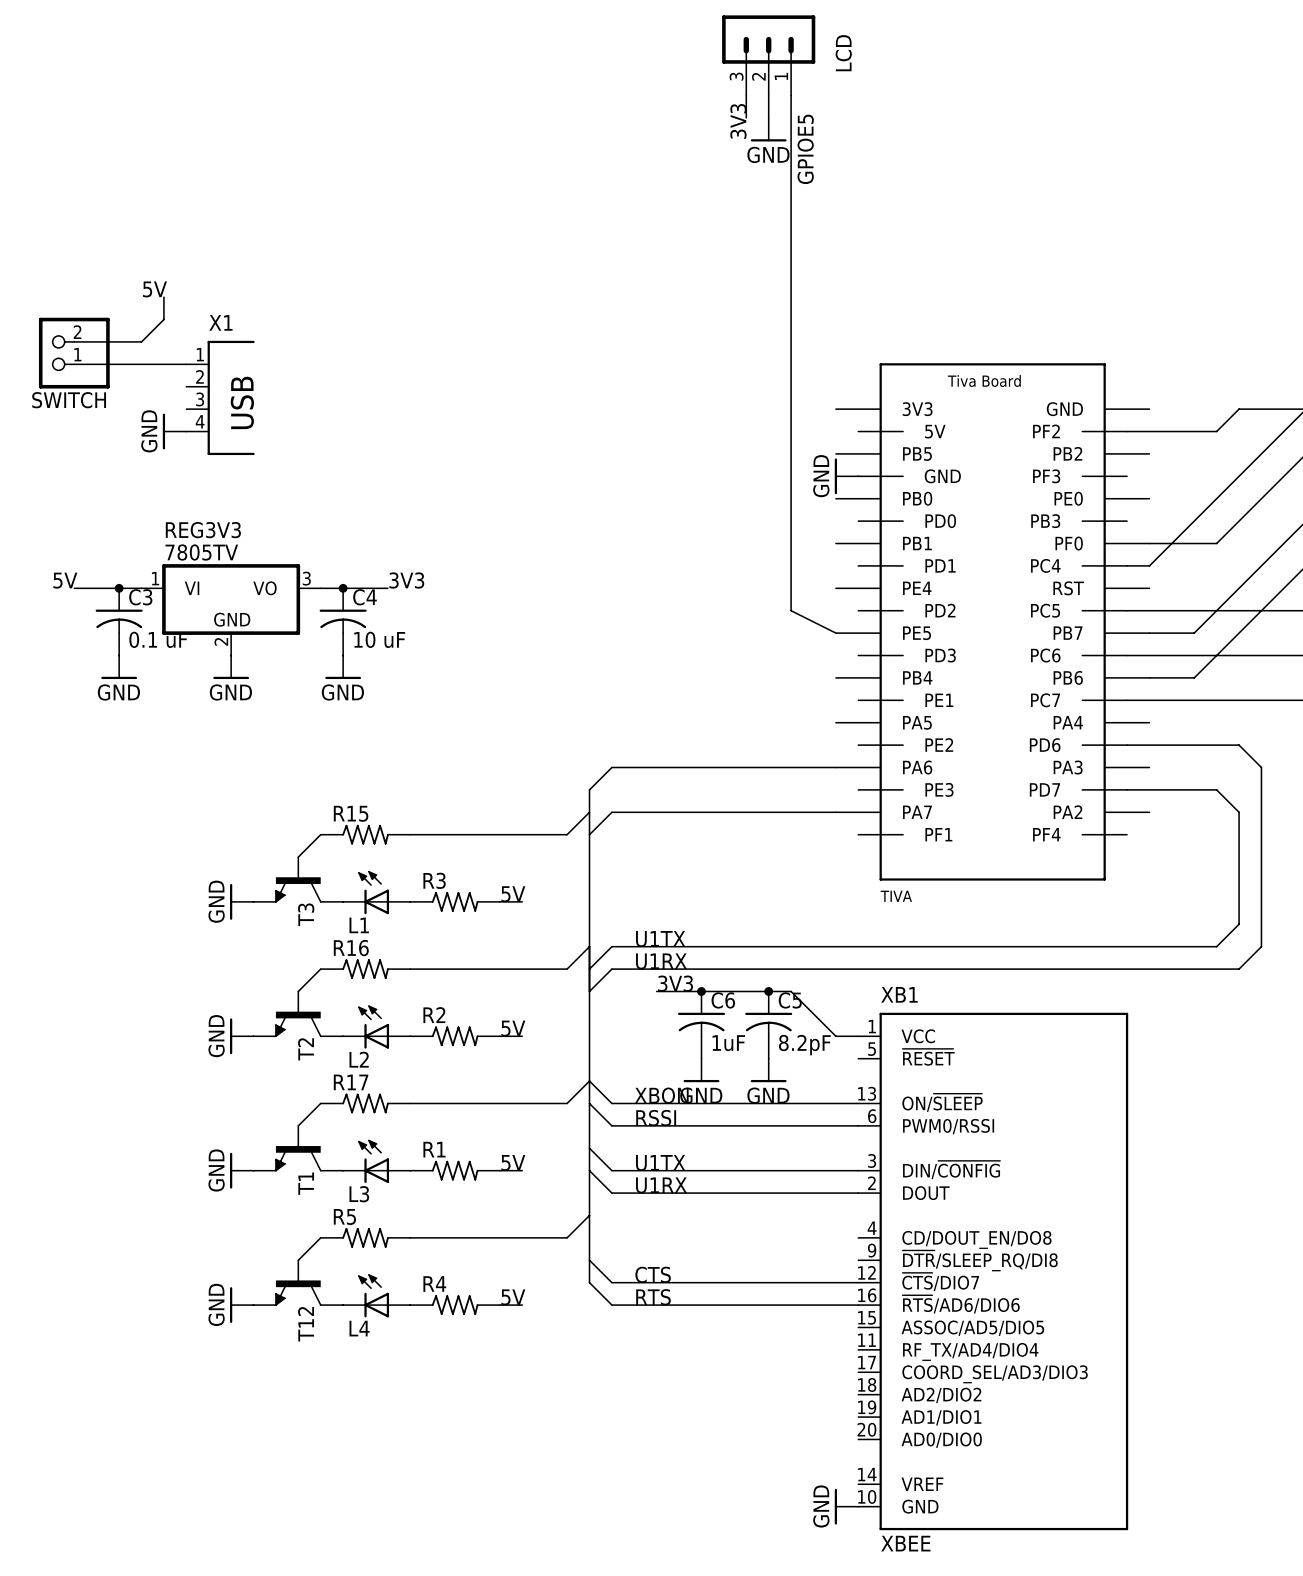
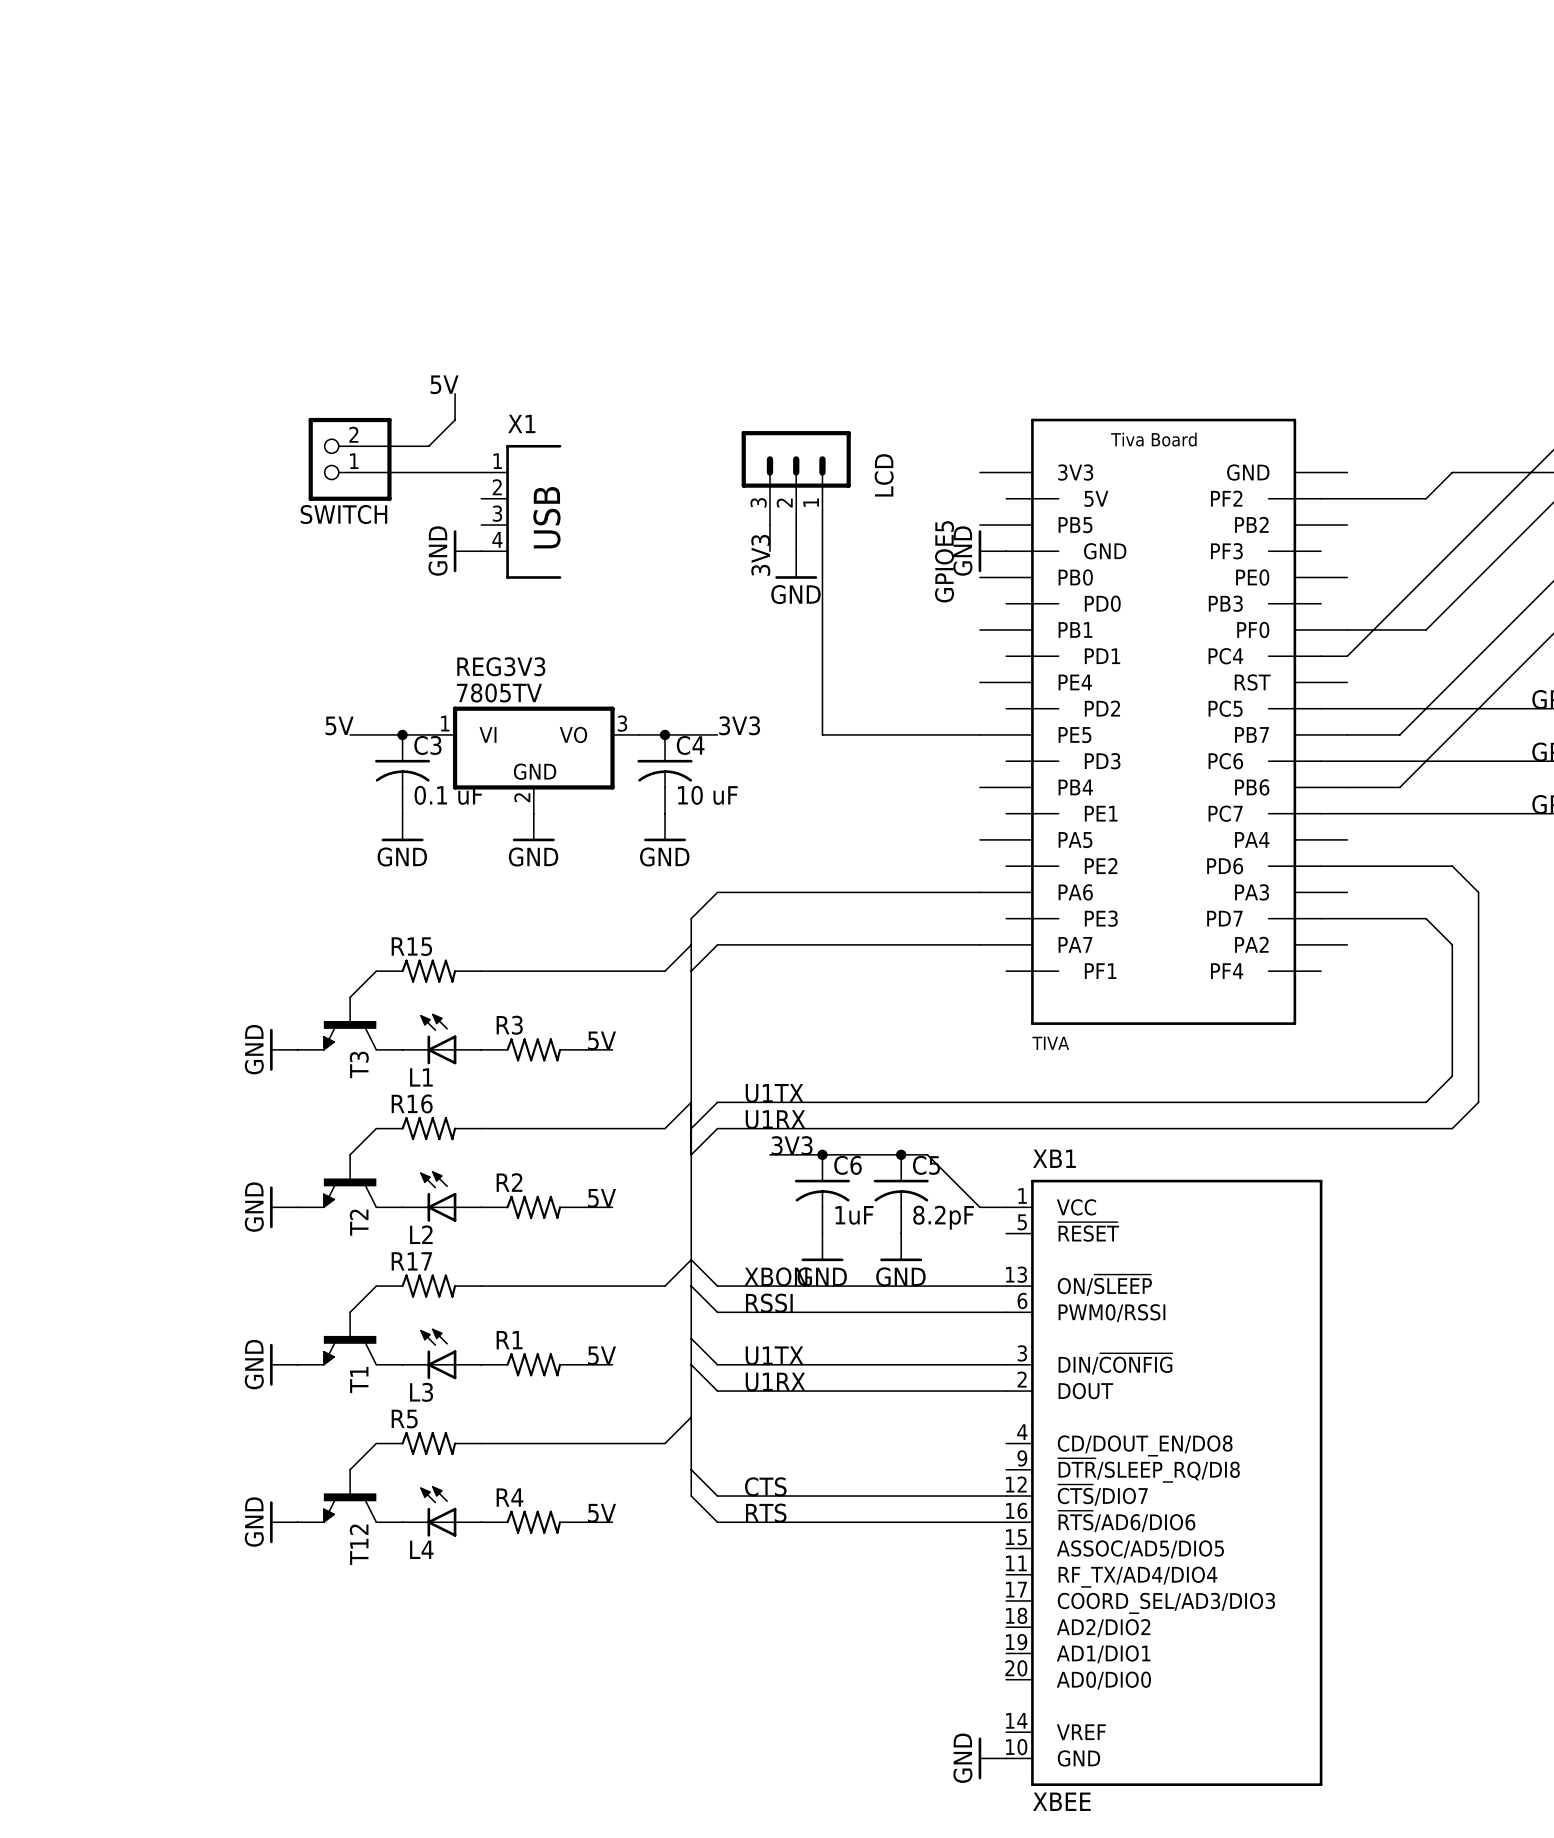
LCD: (768, 55) -> none
wire: (746, 95) (746, 117) -> none
wire: (768, 95) (768, 117) -> none
wire: (791, 95) (791, 610) (835, 633) -> (822, 525) (822, 734) (979, 734)
label: 3V3 (738, 121) -> none
power symbol: GND (768, 129) -> none
label: GPIOE5 (805, 149) -> none
label: 5V (154, 289) -> none
wire: (163, 297) (163, 319) (141, 341) (74, 341) -> none
label: none -> 5V (444, 384)
wire: none -> (455, 393) (455, 420) (428, 446) (350, 446)
SWITCH: (74, 353) -> none
wire: (74, 364) (186, 364) -> none
X1 position: (220, 397) -> (521, 511)
SWITCH: none -> (350, 459)
wire: none -> (350, 472) (481, 472)
LCD: none -> (796, 478)
power symbol: GND (174, 431) -> none
wire: none -> (769, 525) (769, 551)
wire: none -> (796, 525) (796, 551)
power symbol: none -> GND (467, 551)
label: none -> 3V3 (760, 555)
label: none -> GPIOE5 (944, 561)
power symbol: none -> GND (796, 565)
label: 5V (65, 580) -> none
label: 3V3 (406, 580) -> none
wire: (74, 588) (141, 588) -> none
junction: (119, 588) -> none
wire: (320, 588) (387, 588) -> (350, 734) (428, 734)
junction position: (343, 588) -> (402, 734)
REG3V3 position: (231, 609) -> (533, 760)
C3 position: (119, 621) -> (402, 774)
C4 position: (343, 621) -> (665, 774)
label: none -> 5V (339, 725)
label: none -> 3V3 (739, 725)
wire: none -> (638, 734) (717, 734)
junction: none -> (665, 734)
power symbol: GND (119, 667) -> none
power symbol: GND (231, 667) -> none
power symbol position: GND (343, 667) -> GND (402, 827)
power symbol: none -> GND (533, 827)
power symbol: none -> GND (665, 827)

